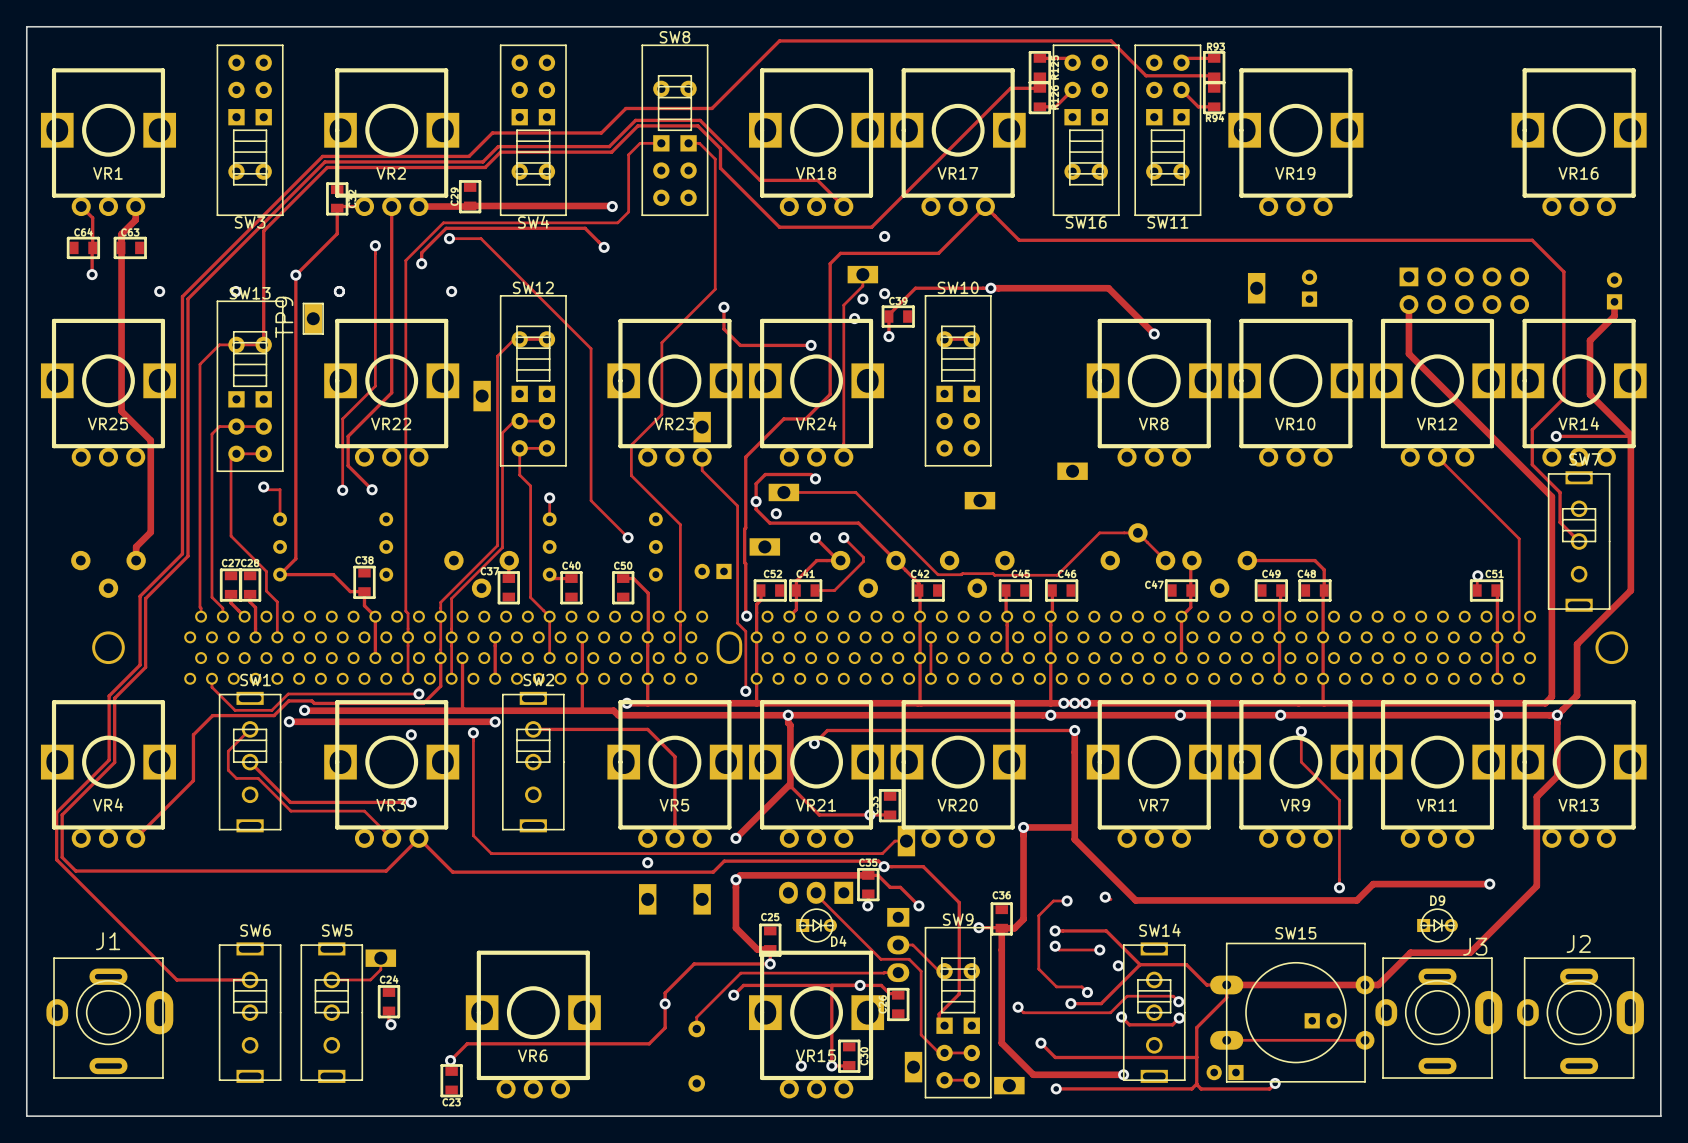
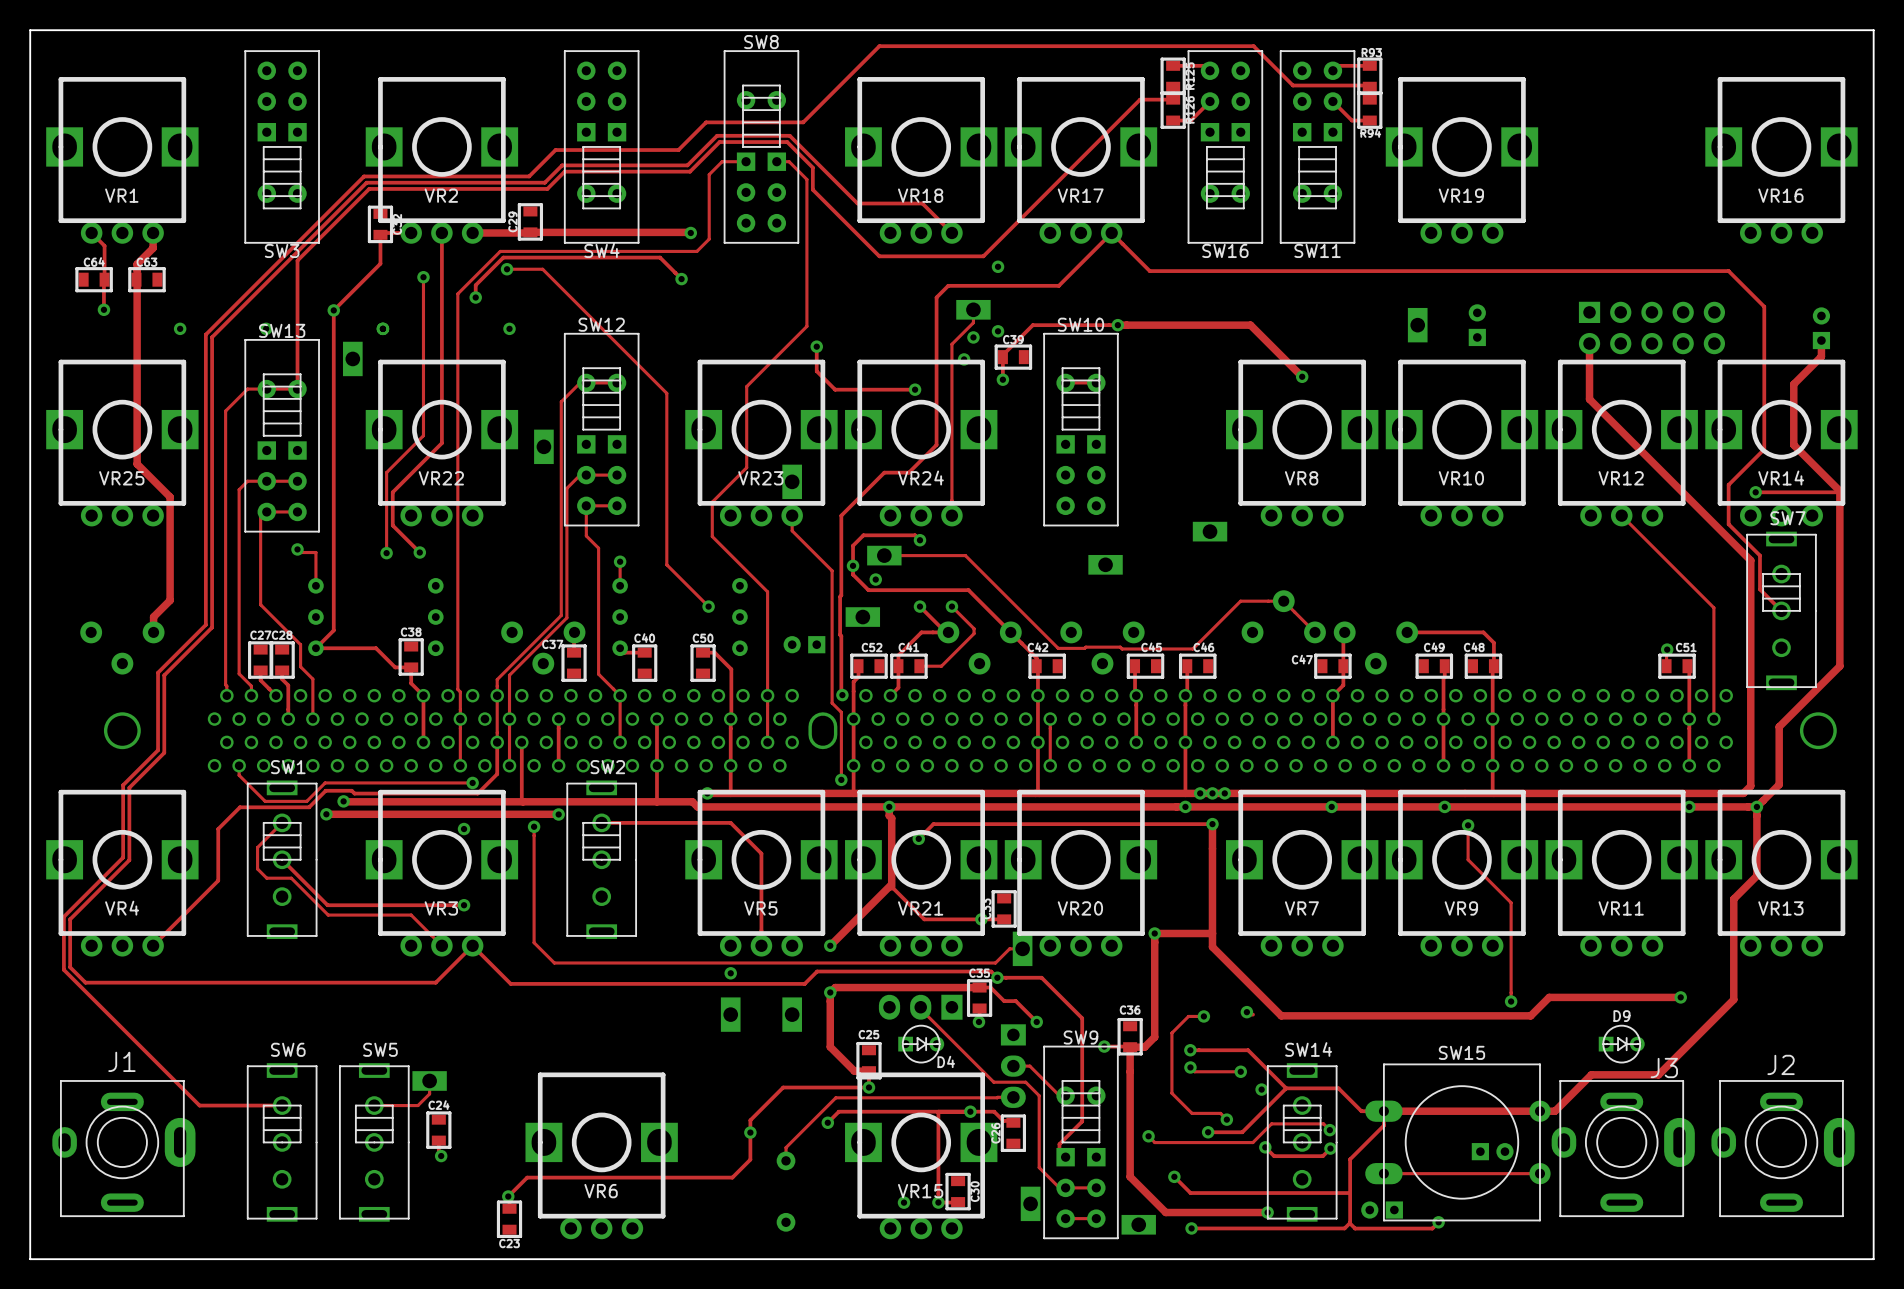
TP9 side: top (313, 318) -> bottom (352, 358)

